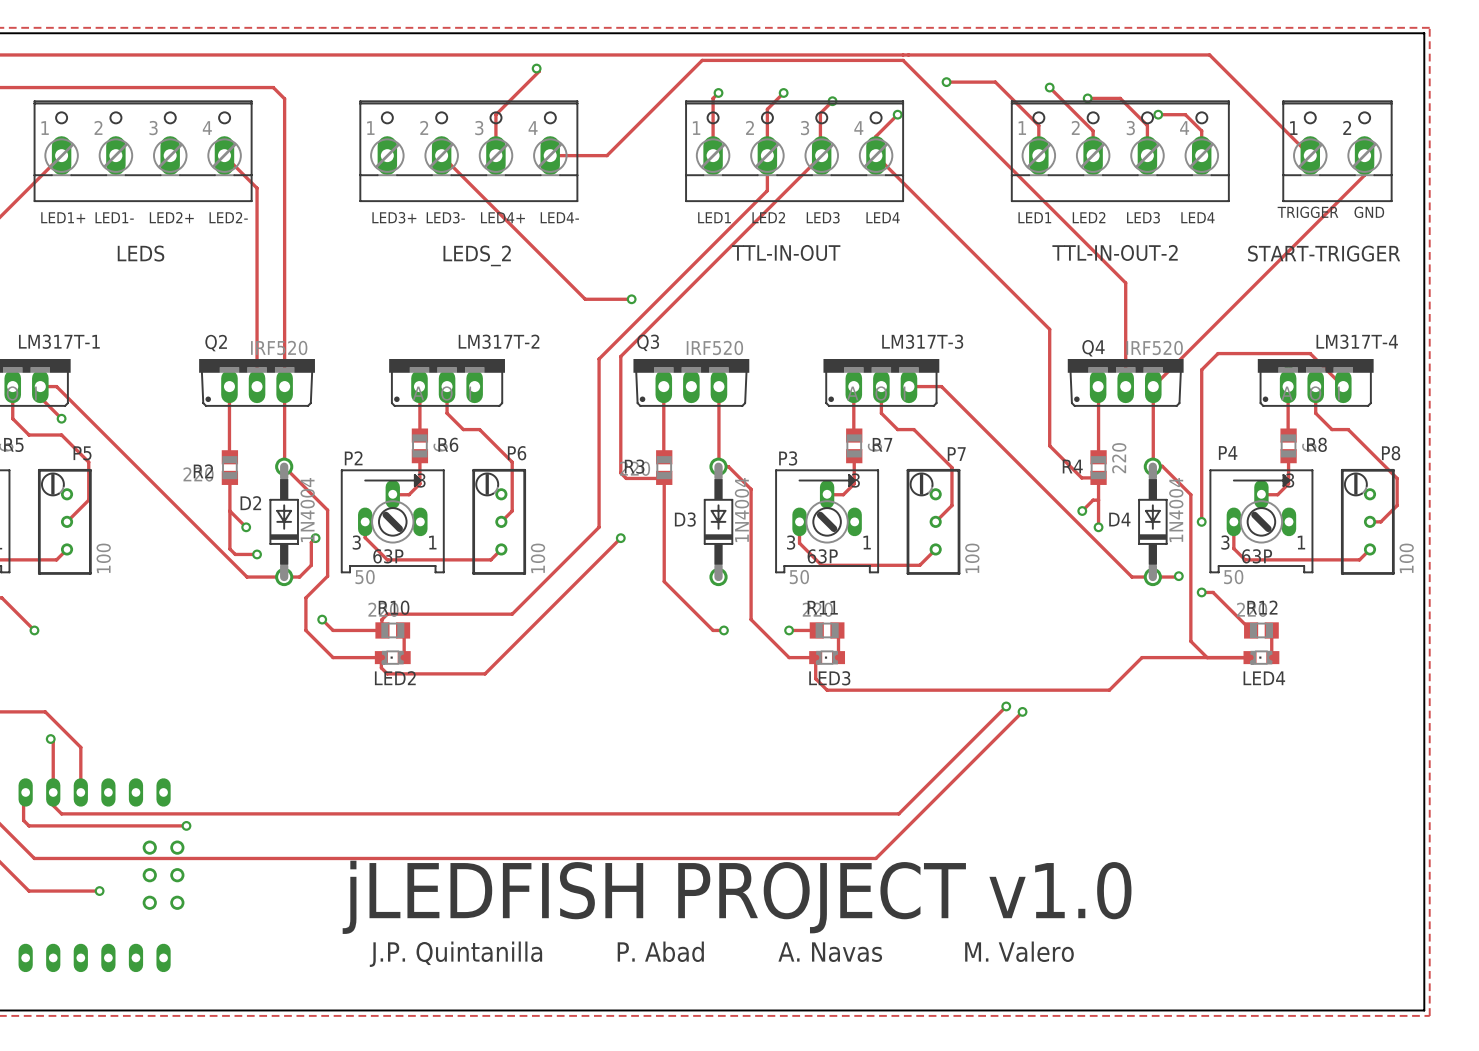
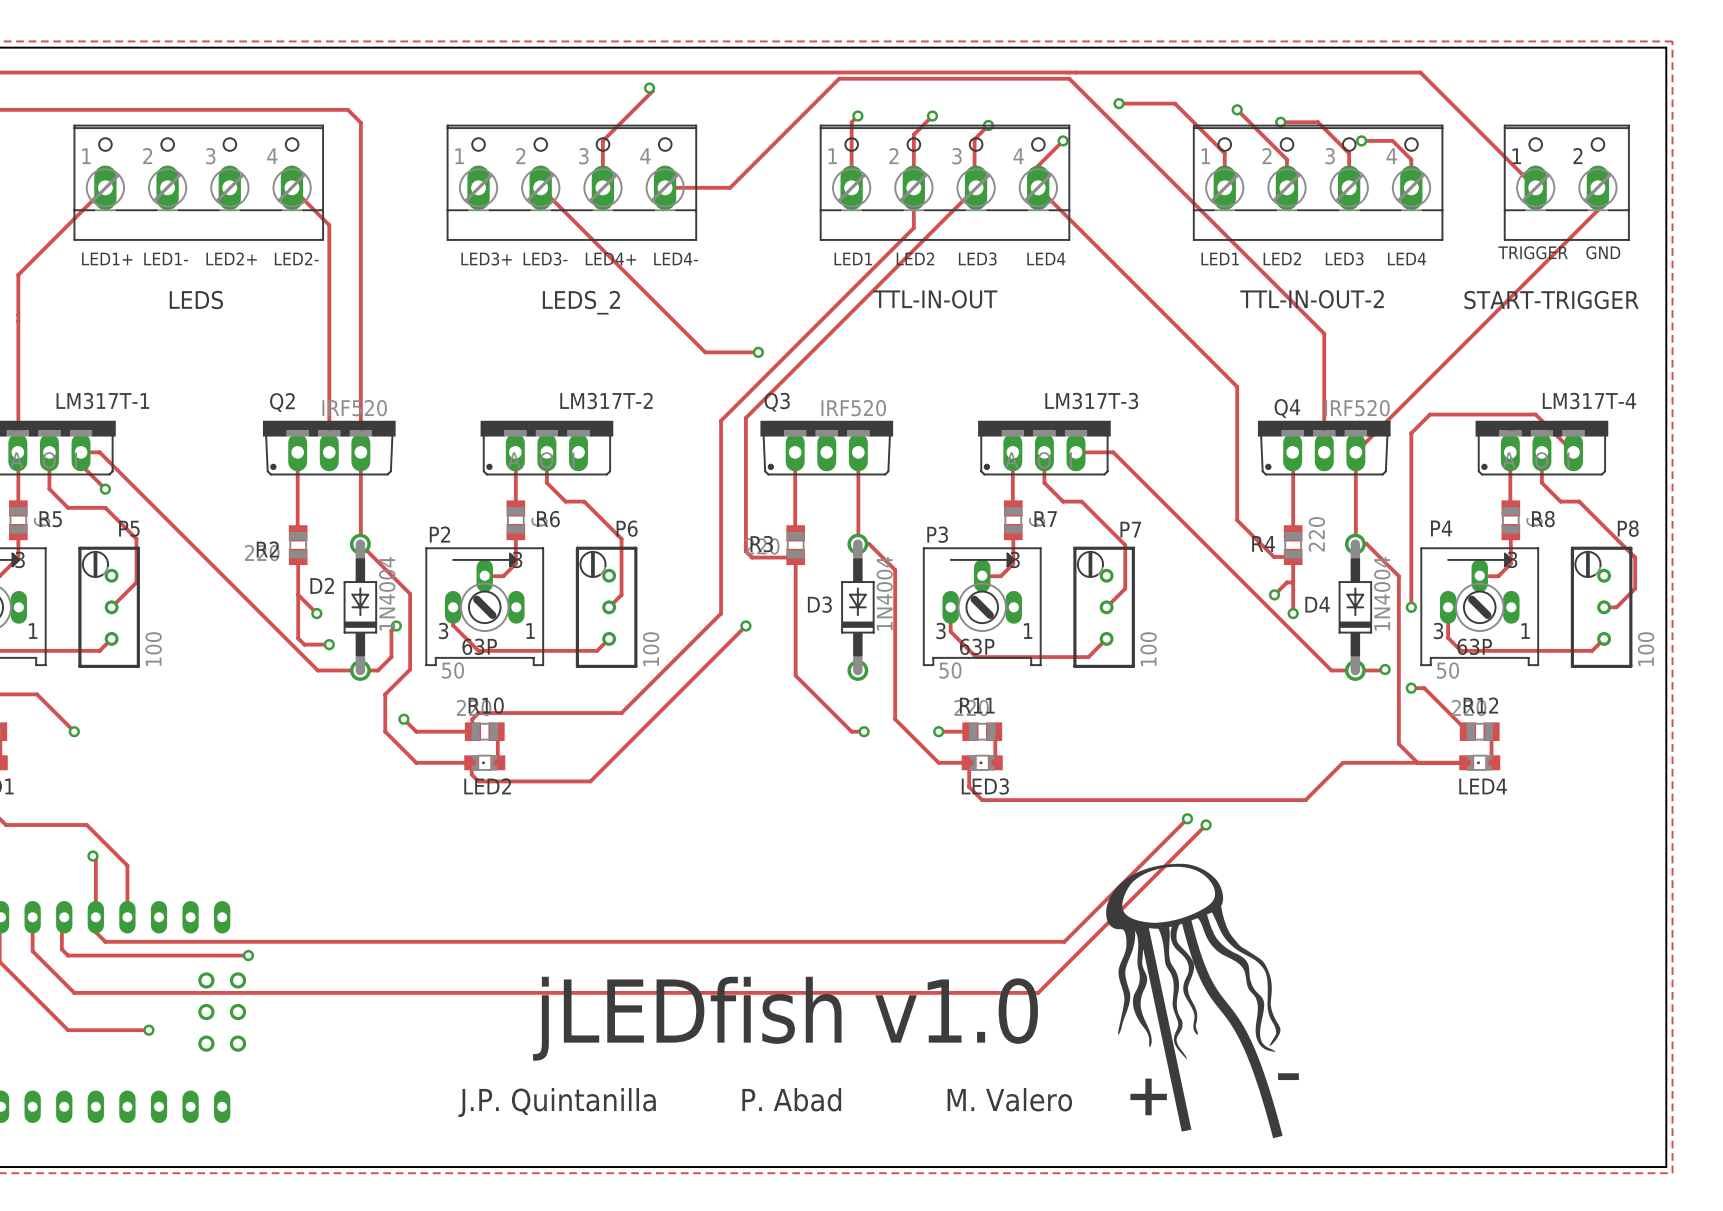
drawing: none -> [1106, 863, 1299, 1139]
text: none -> jLEDfish v1.0 (785, 1018)
text: jLEDFISH PROJECT v1.0 (737, 897) -> none
text position: M. Valero (1019, 951) -> M. Valero (1009, 1099)
text: A. Navas (830, 952) -> none

